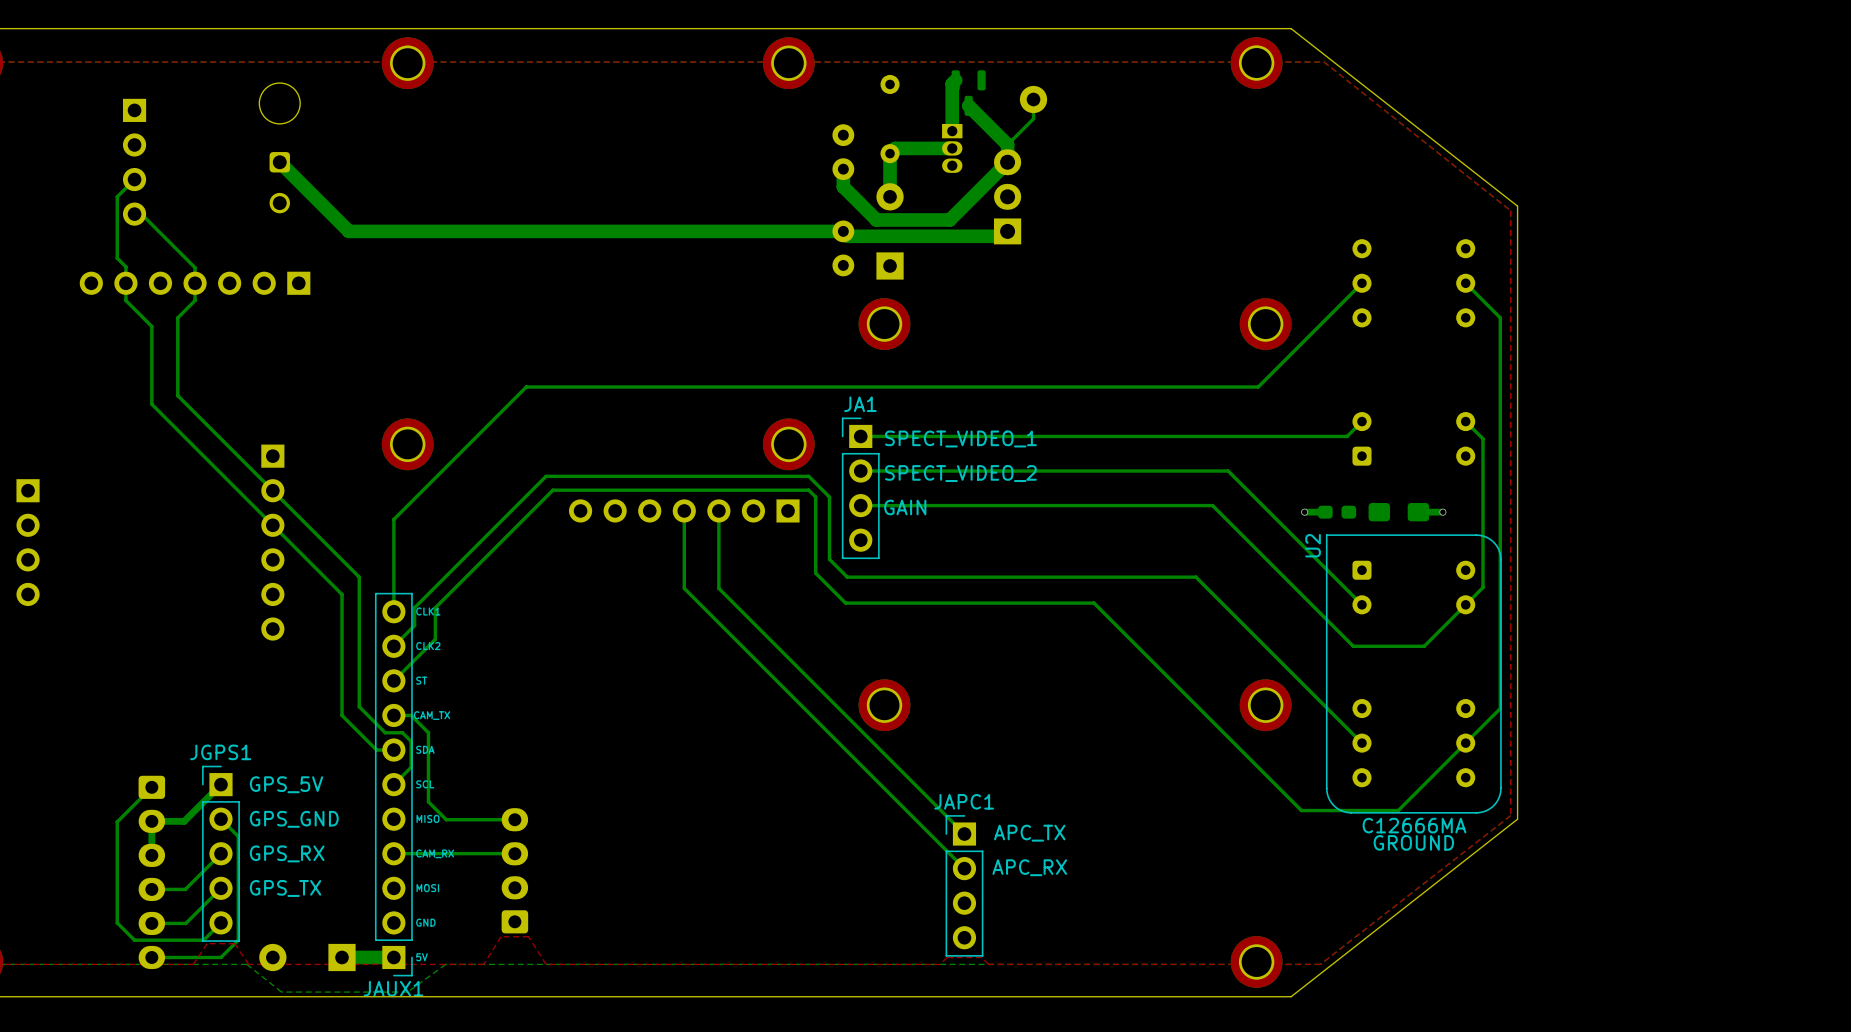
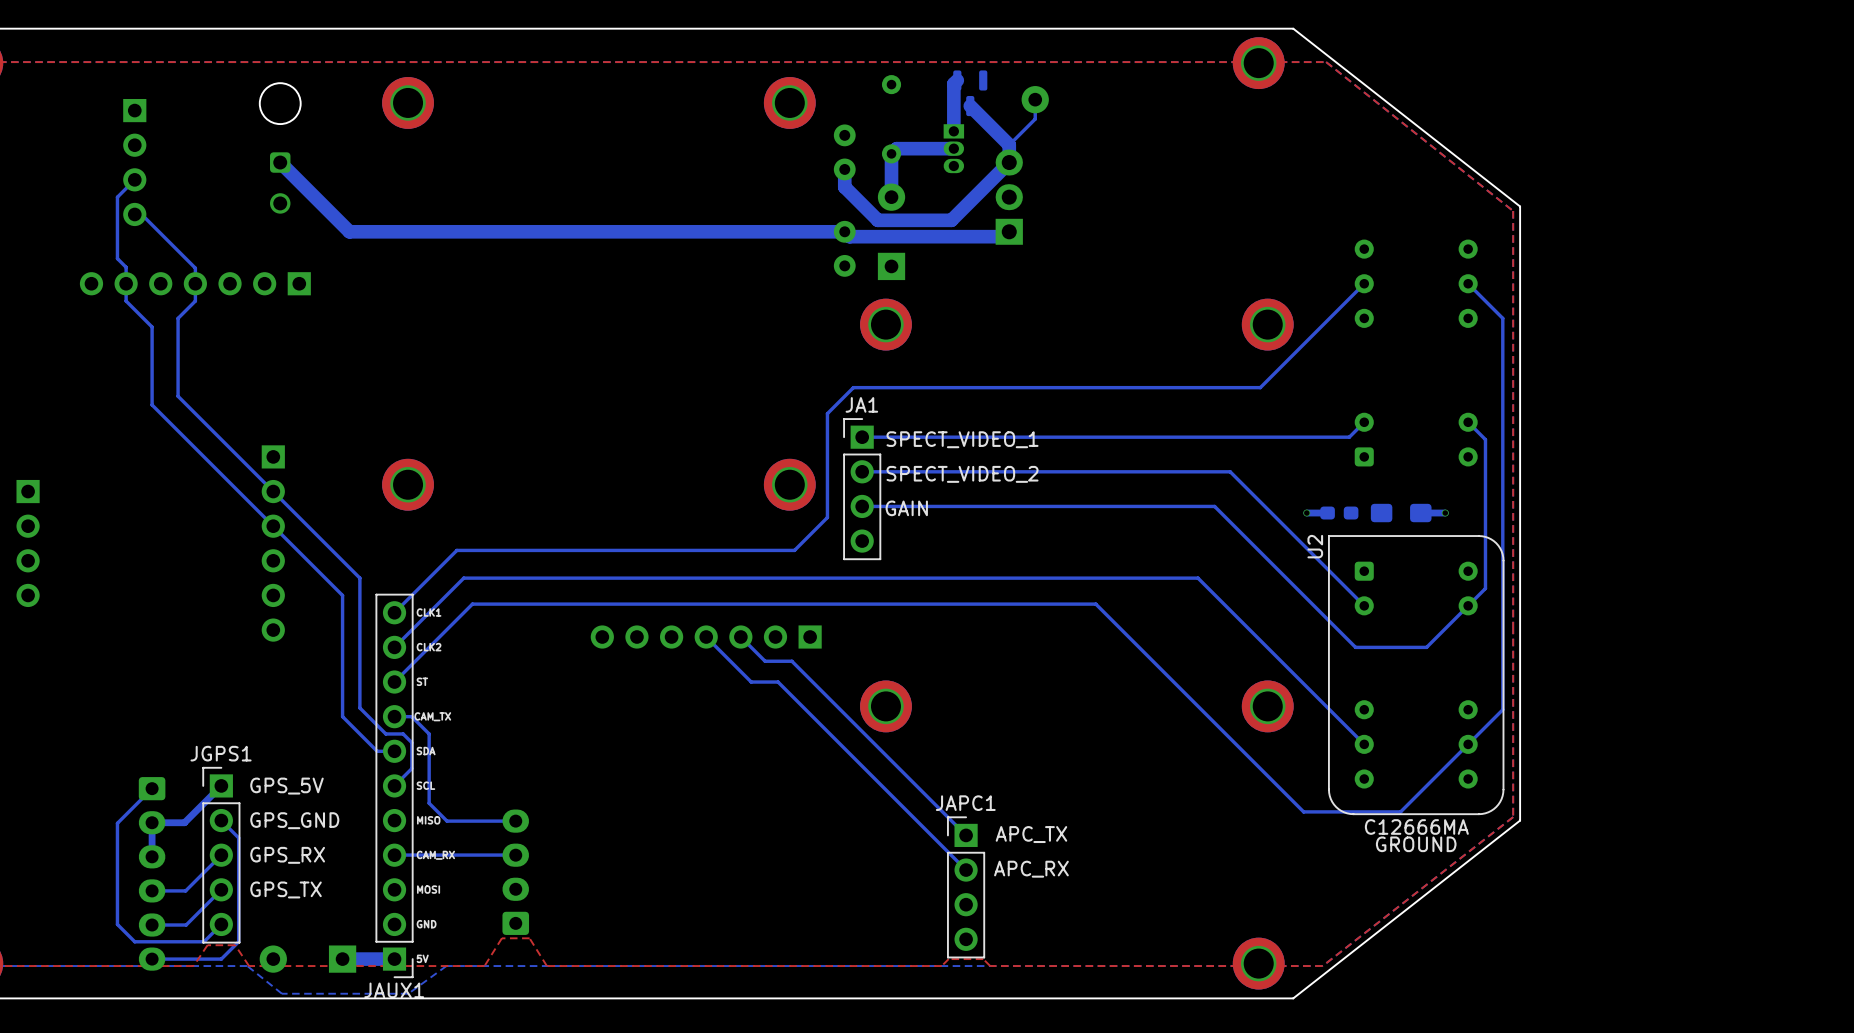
part position: (407, 63) -> (408, 102)
part position: (788, 63) -> (789, 102)
bottom track: (851, 387) (526, 387) (393, 519) (393, 611) -> (853, 387) (827, 413) (827, 517) (794, 550) (456, 550) (394, 612)
part position: (407, 444) -> (408, 484)
part position: (788, 444) -> (789, 484)
bottom track: (684, 510) (684, 588) (776, 680) -> (706, 637) (751, 682) (778, 682)
part position: (684, 510) -> (706, 637)
bottom track: (718, 510) (718, 588) (790, 660) -> (740, 637) (765, 661) (791, 661)
bottom track: (847, 577) (829, 559) (829, 497) (808, 476) (546, 476) (414, 607) (414, 625) -> (848, 578) (463, 578) (415, 626)
bottom track: (845, 603) (815, 573) (815, 497) (808, 490) (552, 490) (435, 607) (435, 639) -> (847, 604) (472, 604) (436, 640)

